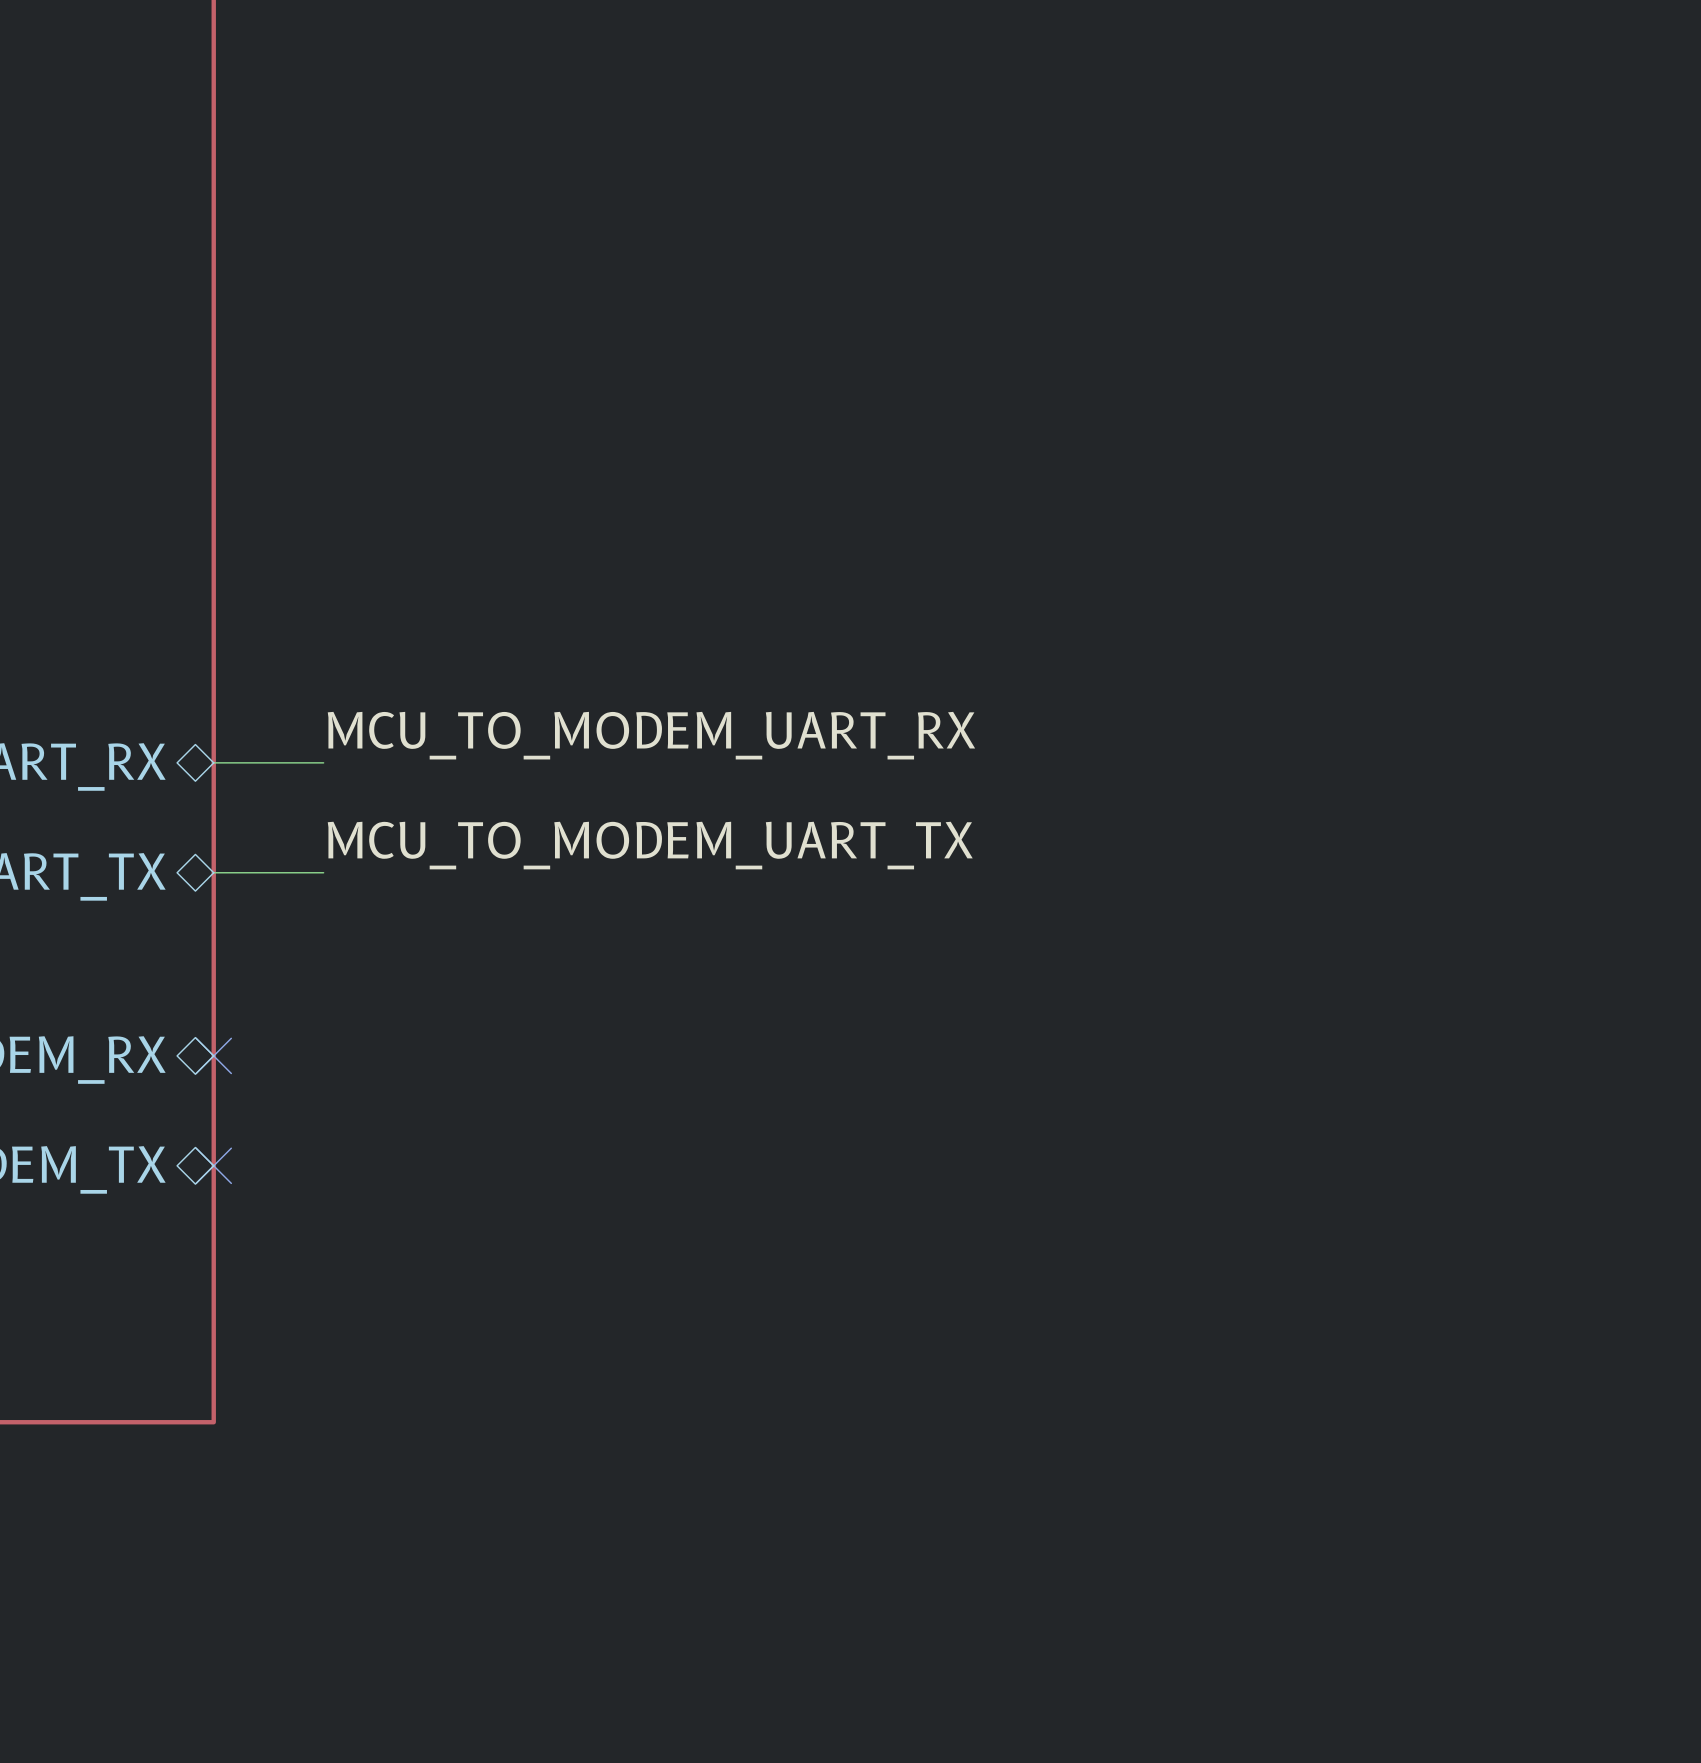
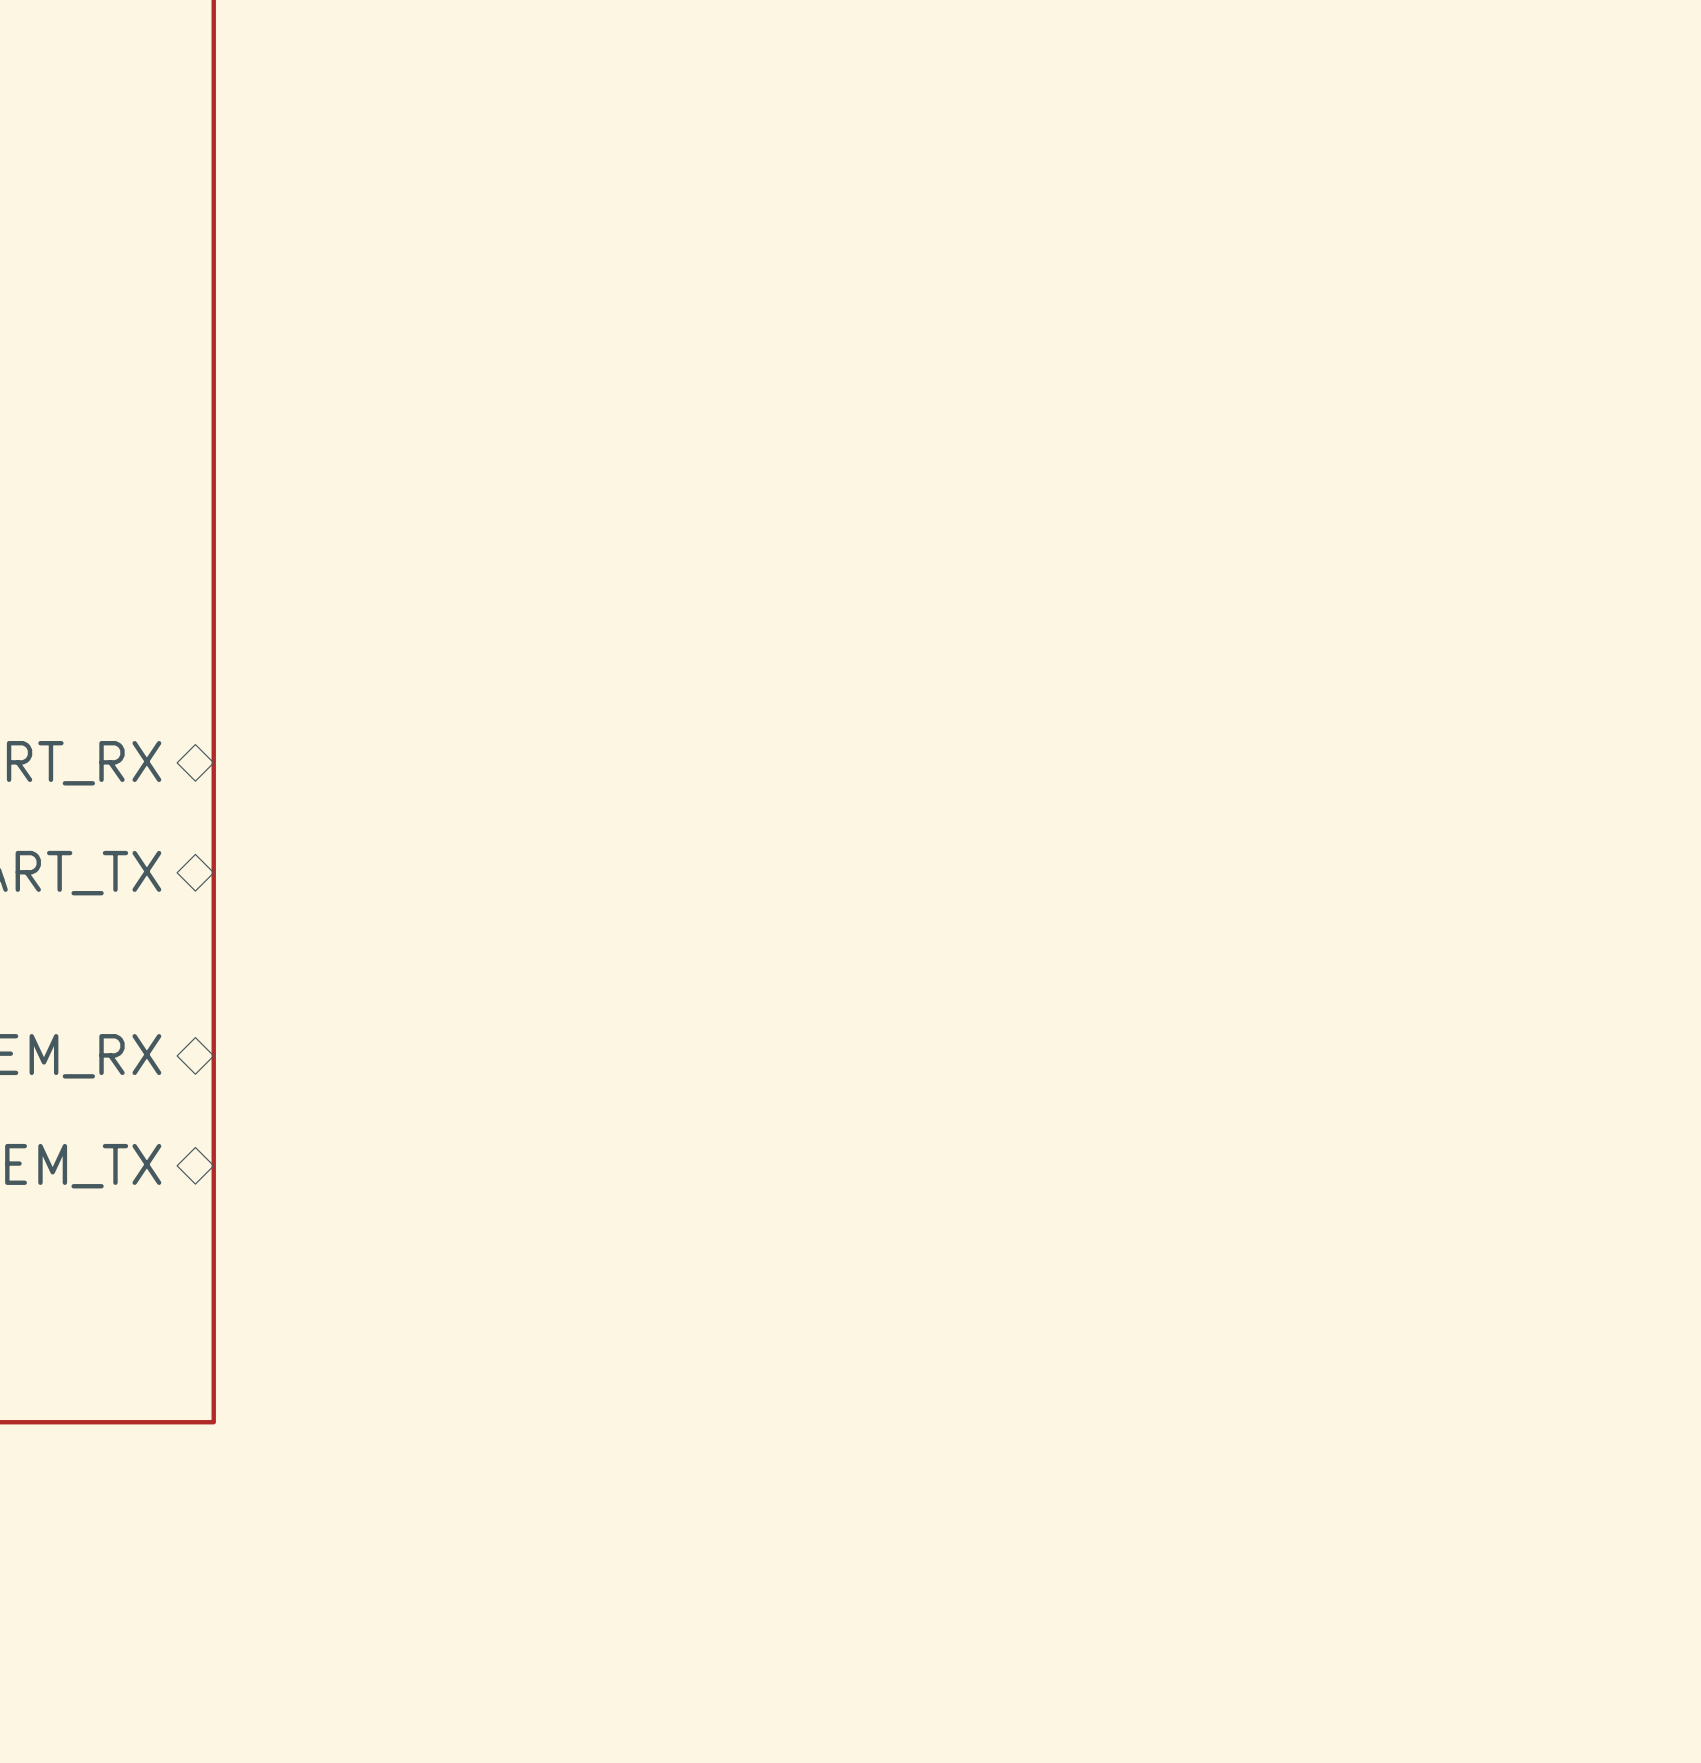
label: MCU_TO_MODEM_UART_RX (651, 735) -> none
wire: (213, 762) (323, 762) -> none
label: MCU_TO_MODEM_UART_TX (650, 845) -> none
wire: (213, 872) (323, 872) -> none
no-connect mark: (213, 1055) -> none
no-connect mark: (213, 1165) -> none

